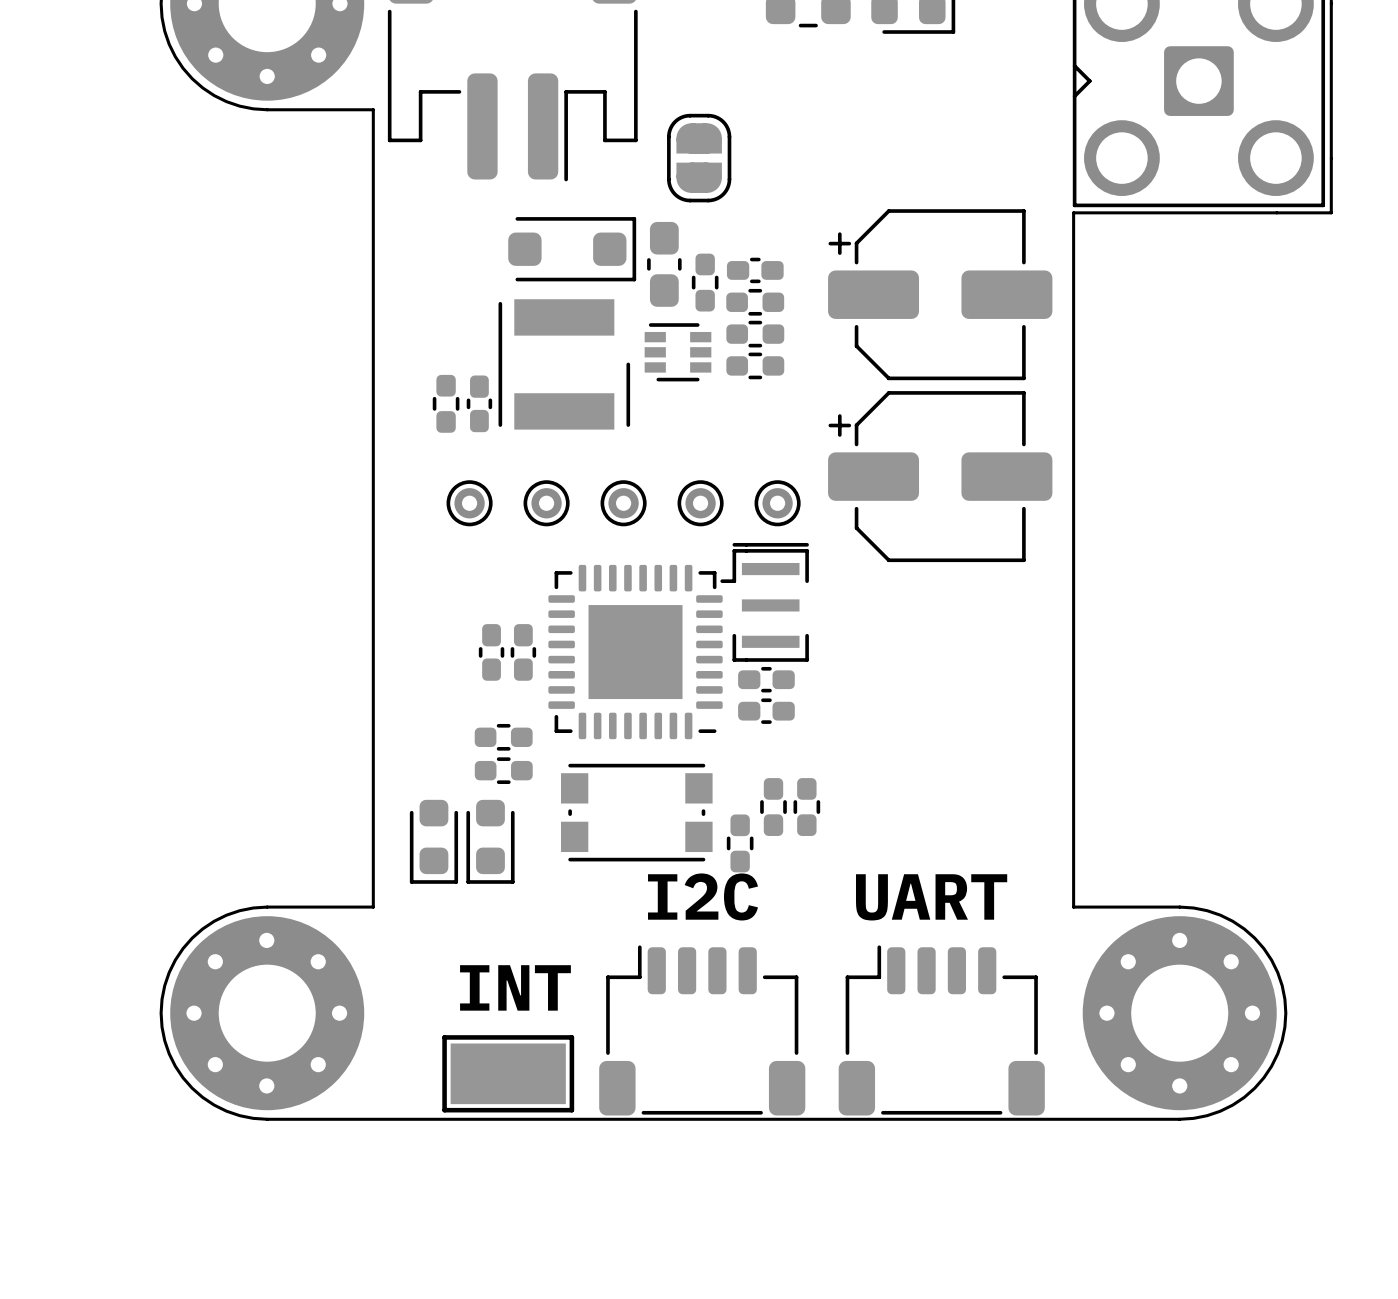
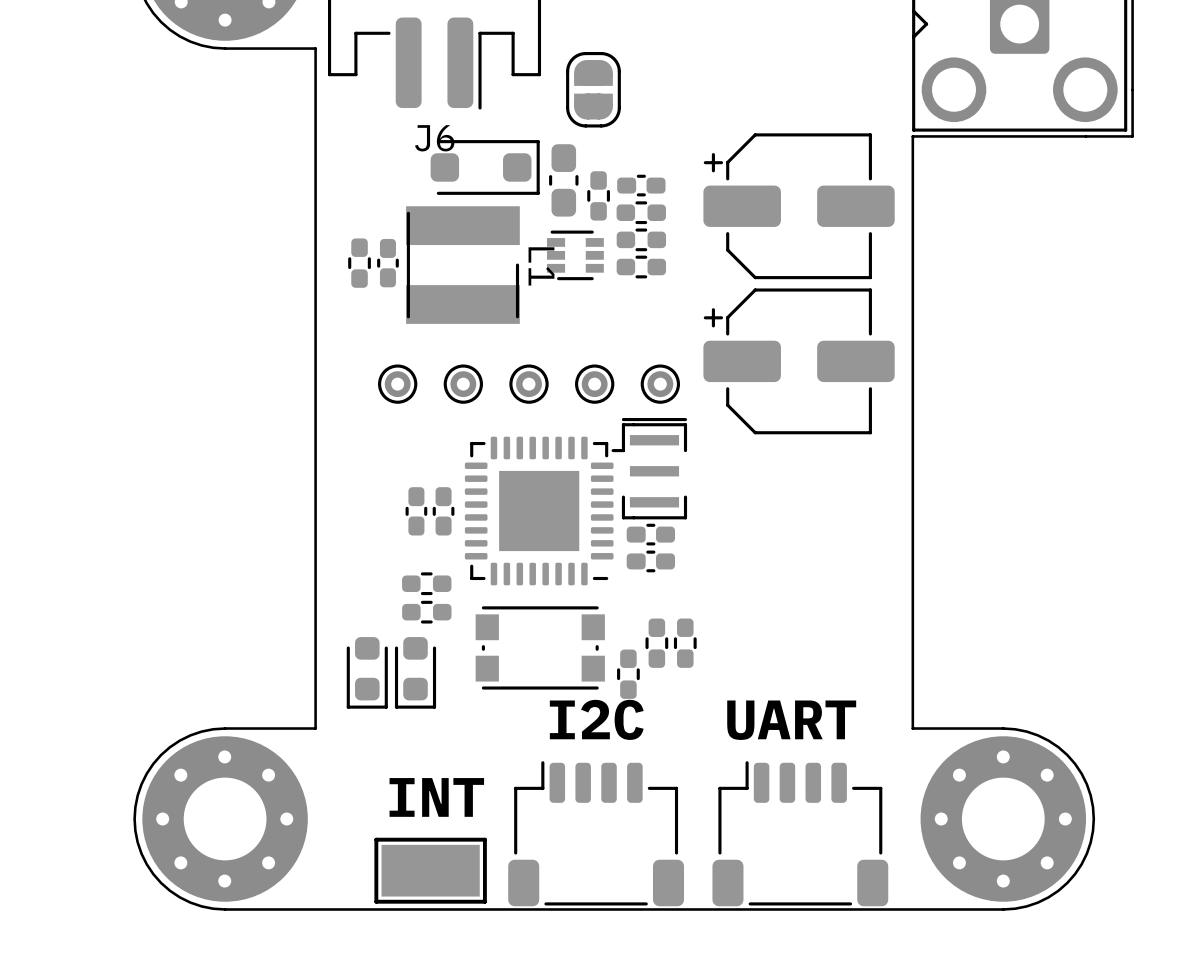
J6 name: none -> J6 (434, 138)
L1: none -> (462, 265)
part: (564, 364) -> none
part position: (446, 403) -> (359, 263)
part position: (479, 403) -> (387, 263)

